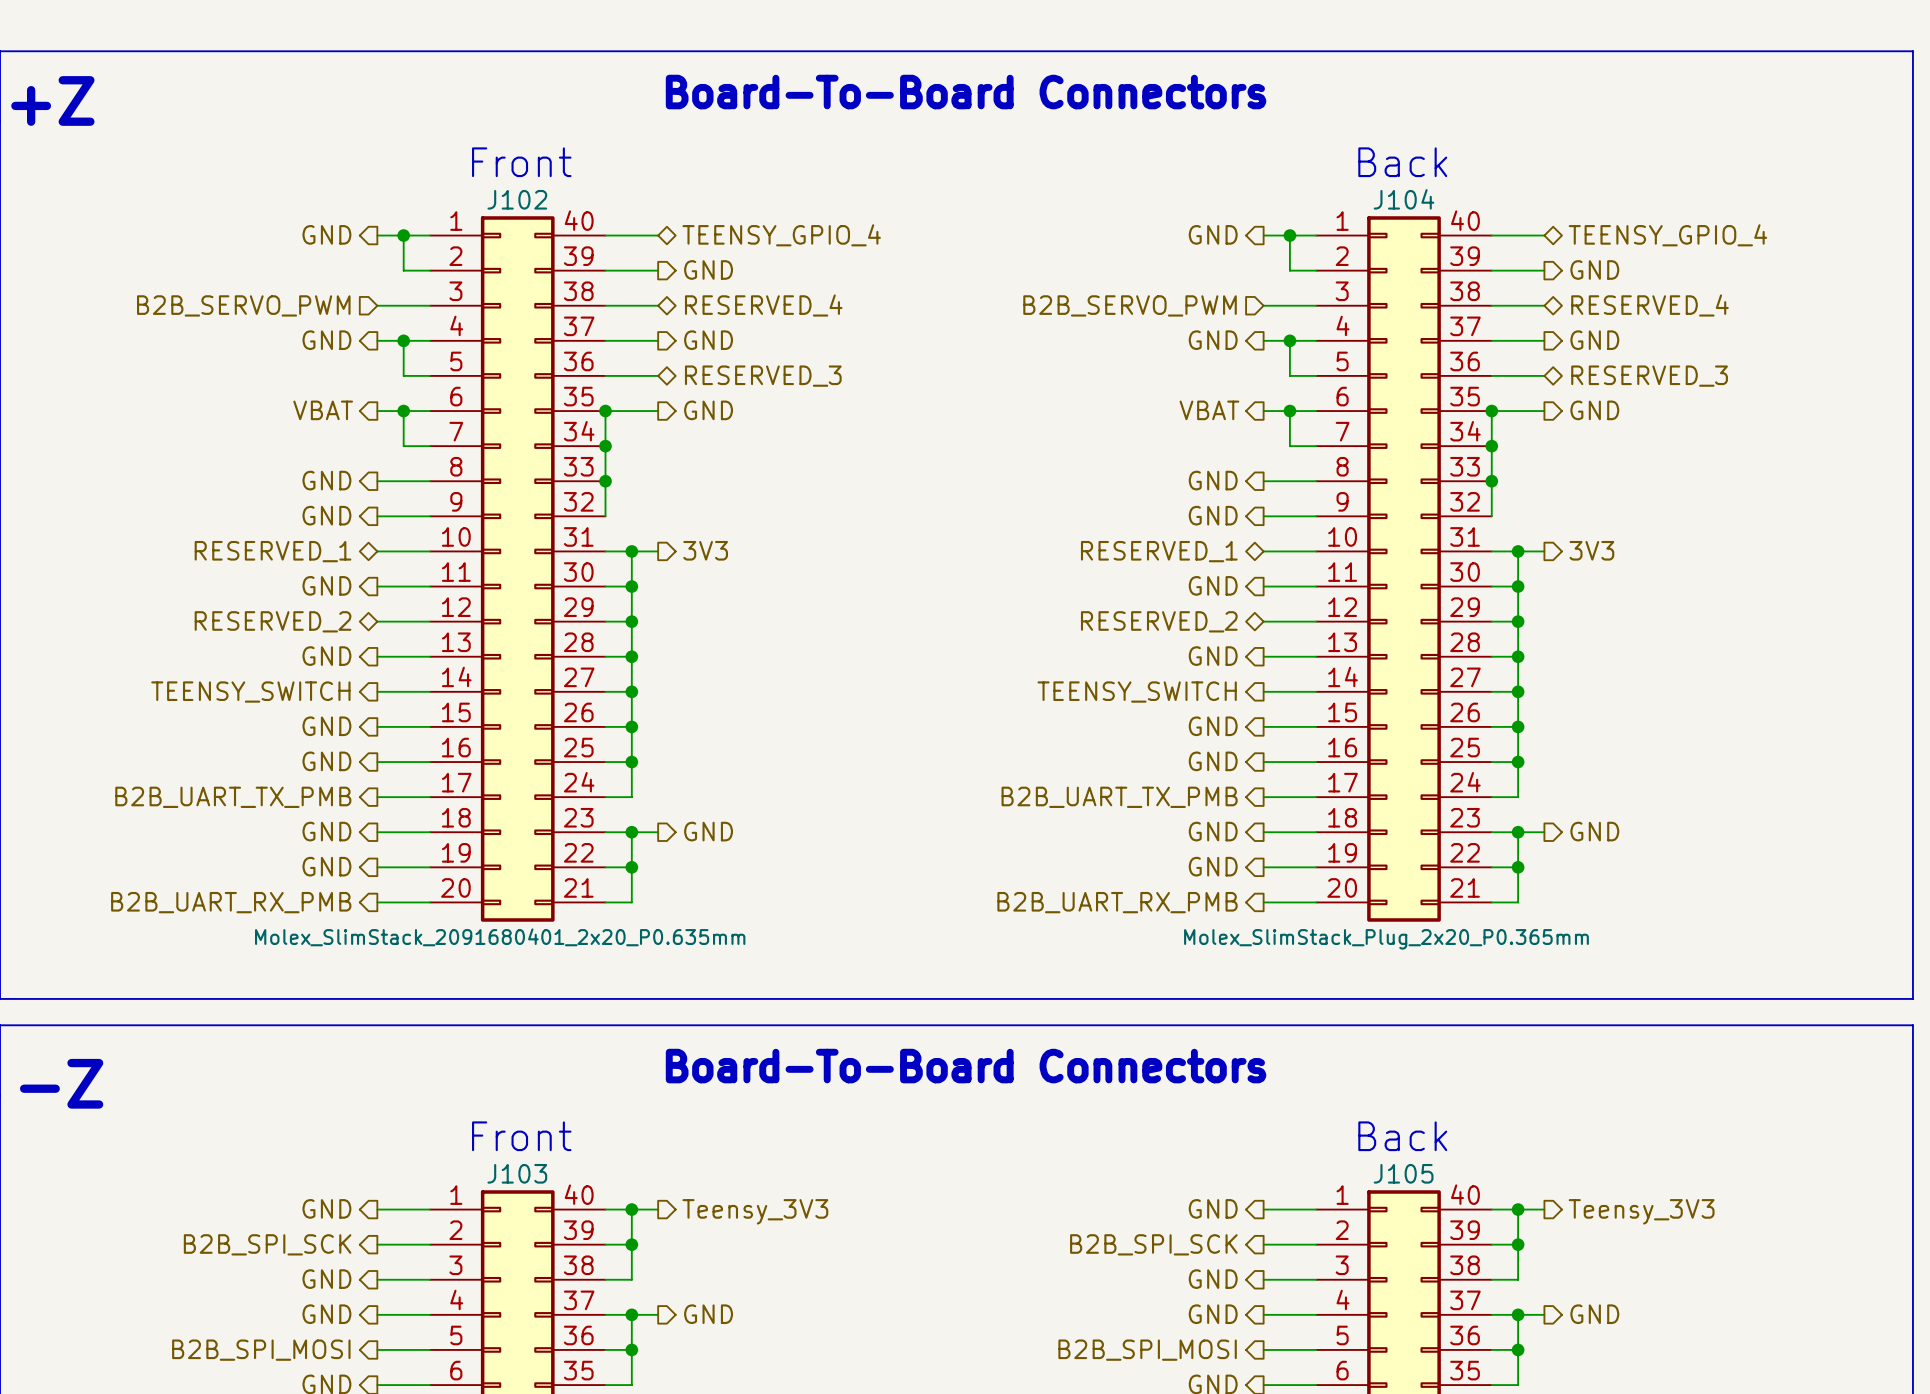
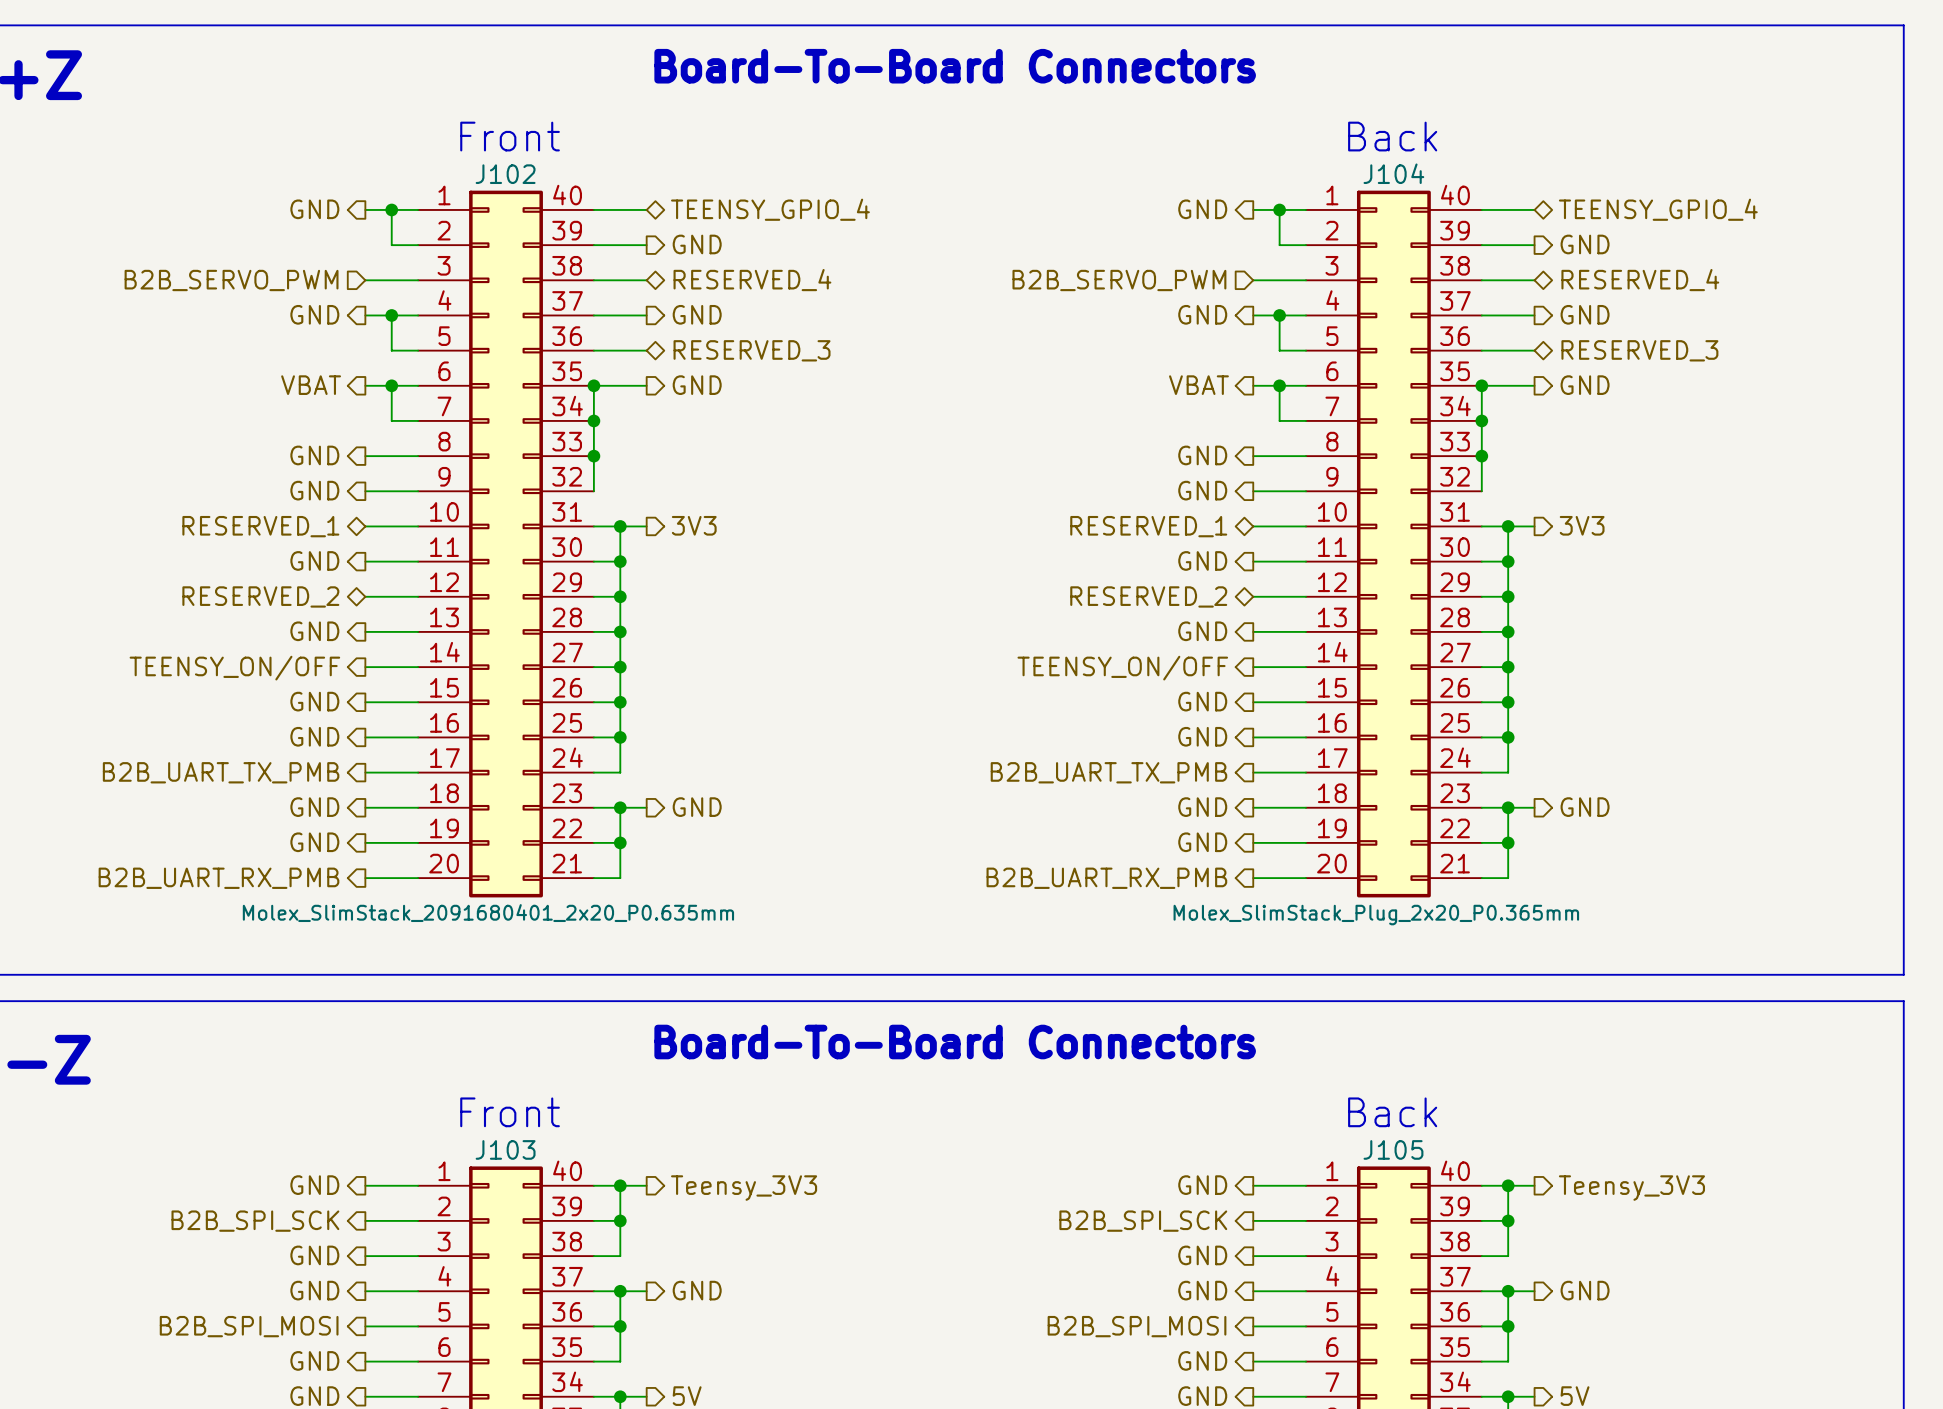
hierarchical label: TEENSY_SWITCH (250, 692) -> TEENSY_ON/OFF (234, 668)
hierarchical label: TEENSY_SWITCH (1137, 692) -> TEENSY_ON/OFF (1122, 668)

